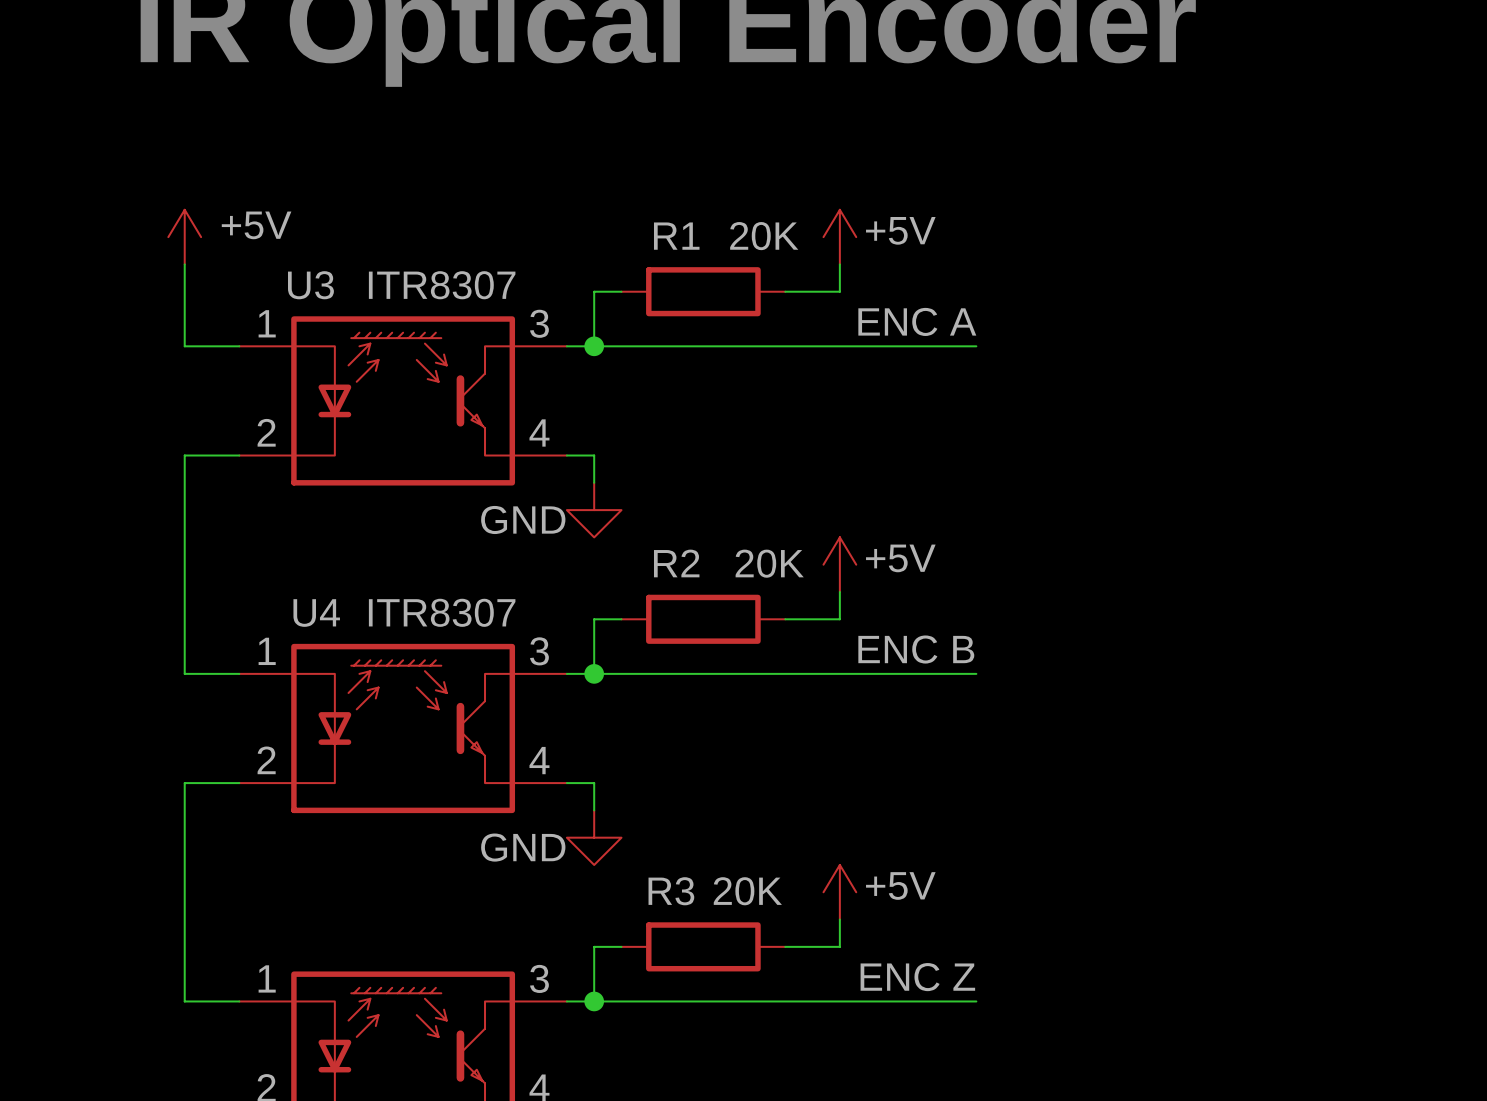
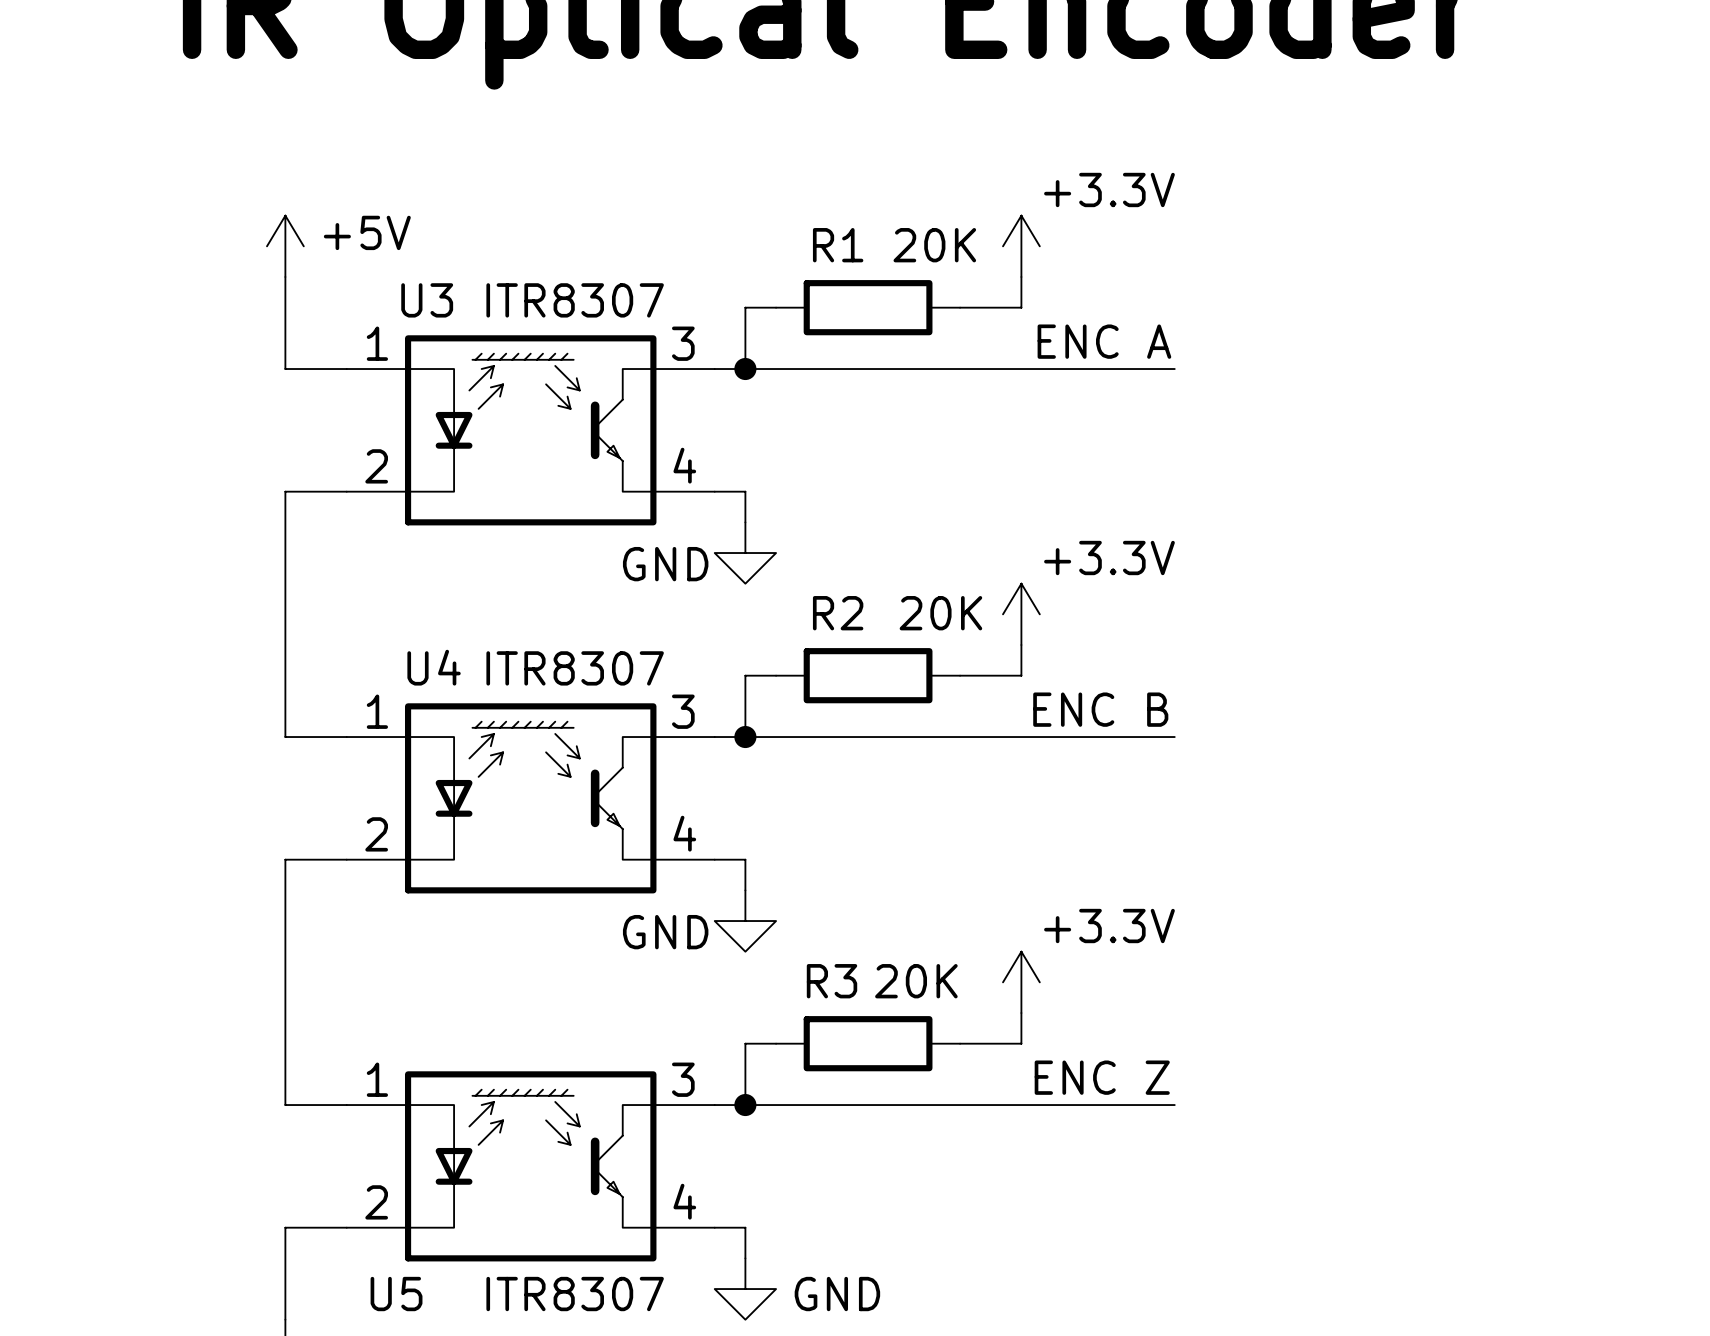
power symbol: +5V (839, 237) -> +3.3V (1021, 246)
power symbol: +5V (839, 564) -> +3.3V (1021, 614)
power symbol: +5V (839, 892) -> +3.3V (1021, 982)

